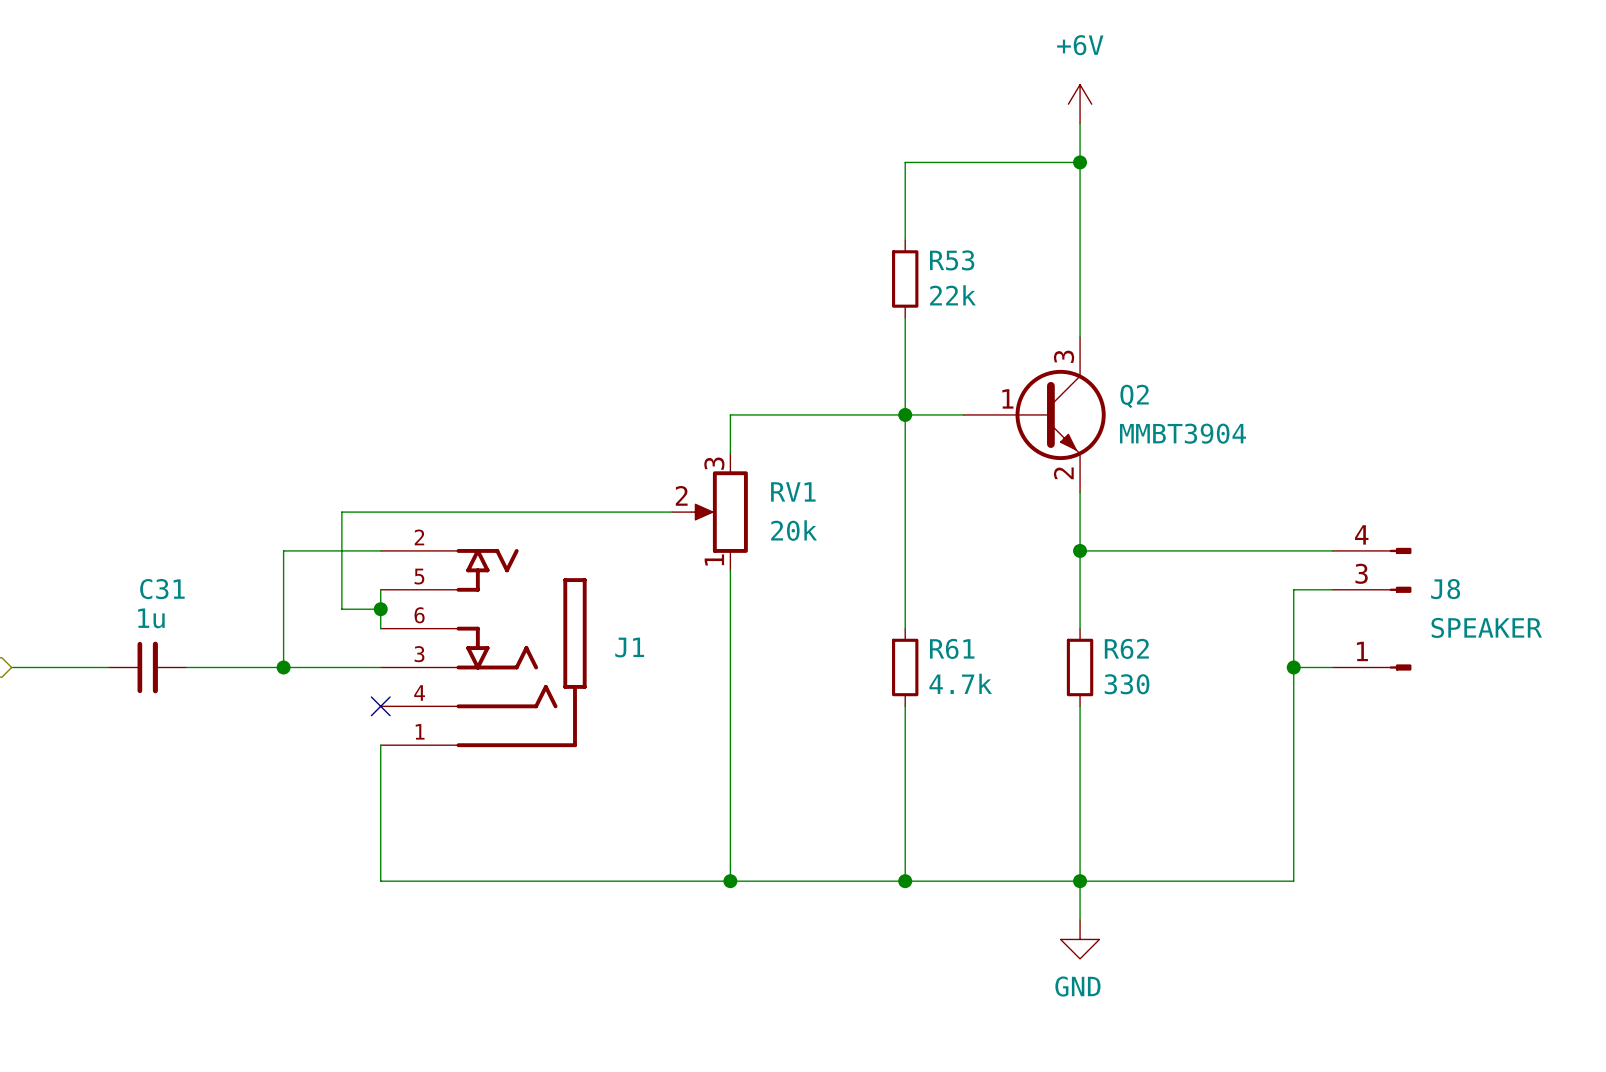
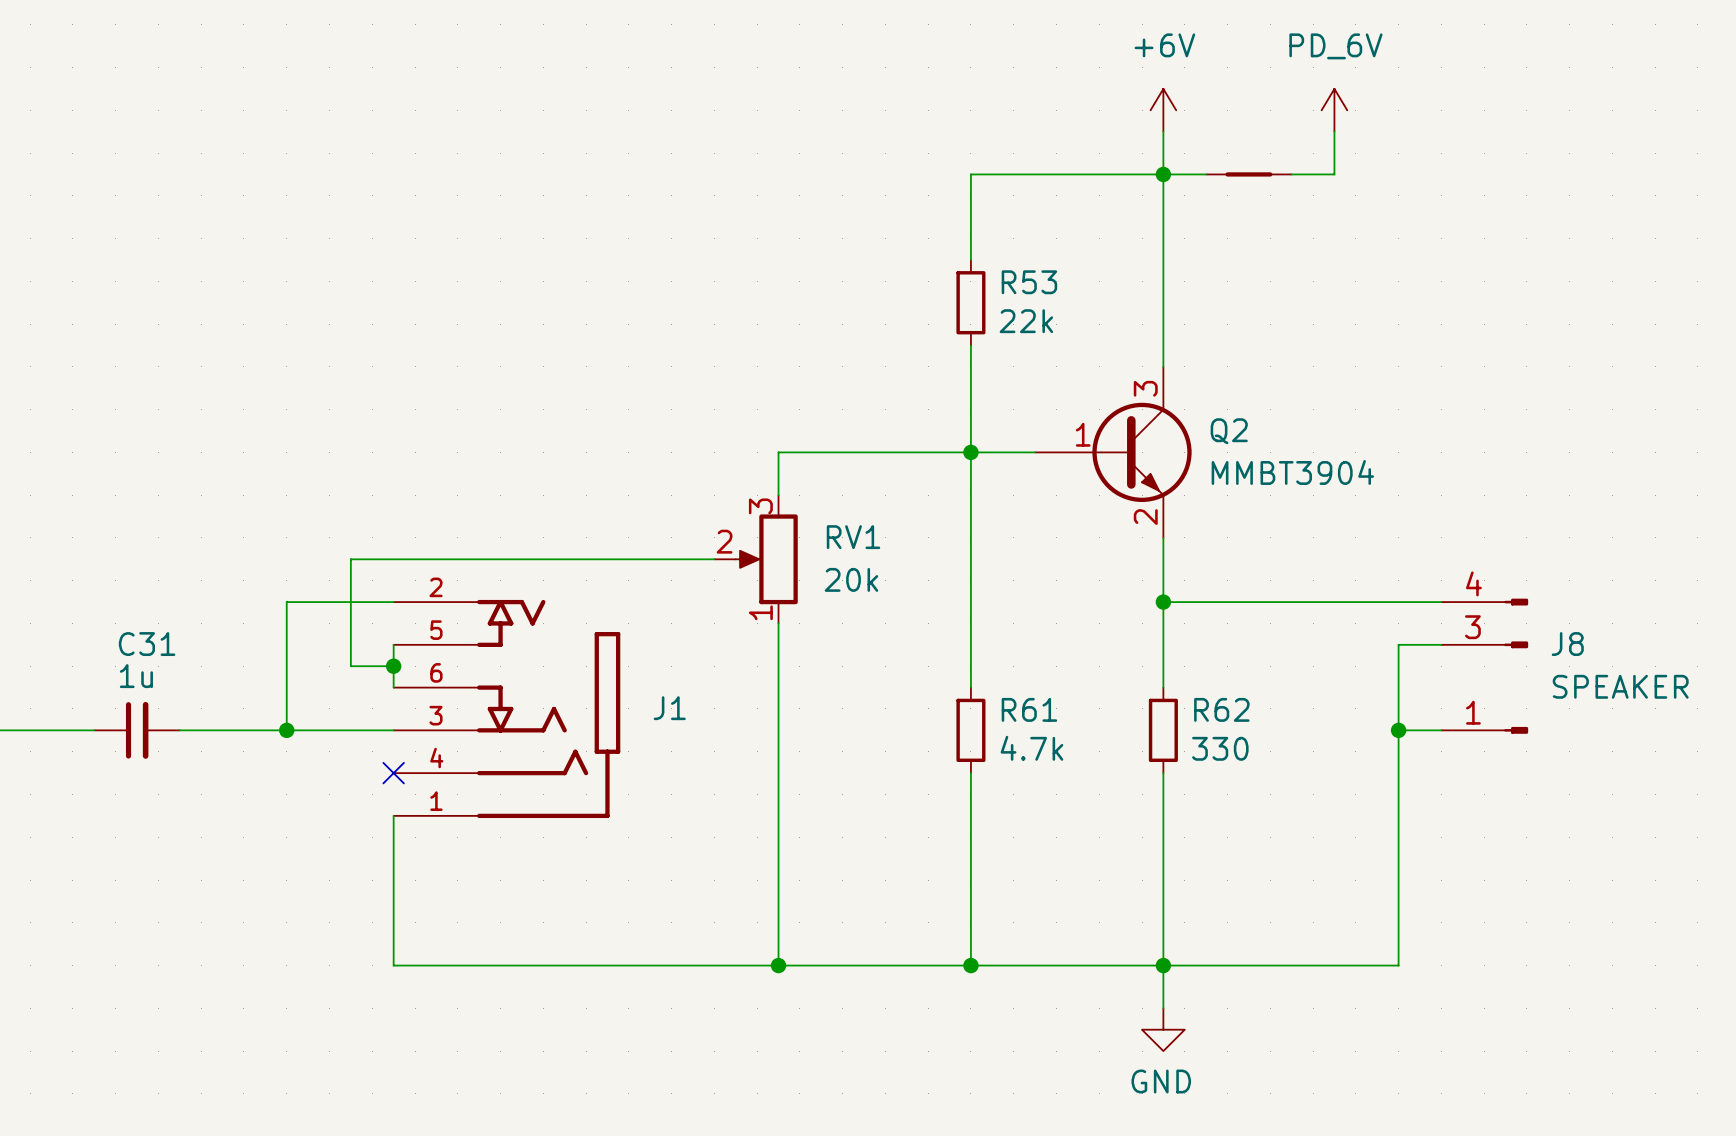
power symbol: none -> PD_6V (1334, 110)
wire: none -> (1334, 131) (1334, 174) (1291, 174)
wire: none -> (1163, 174) (1206, 174)
part: none -> (1248, 174)

